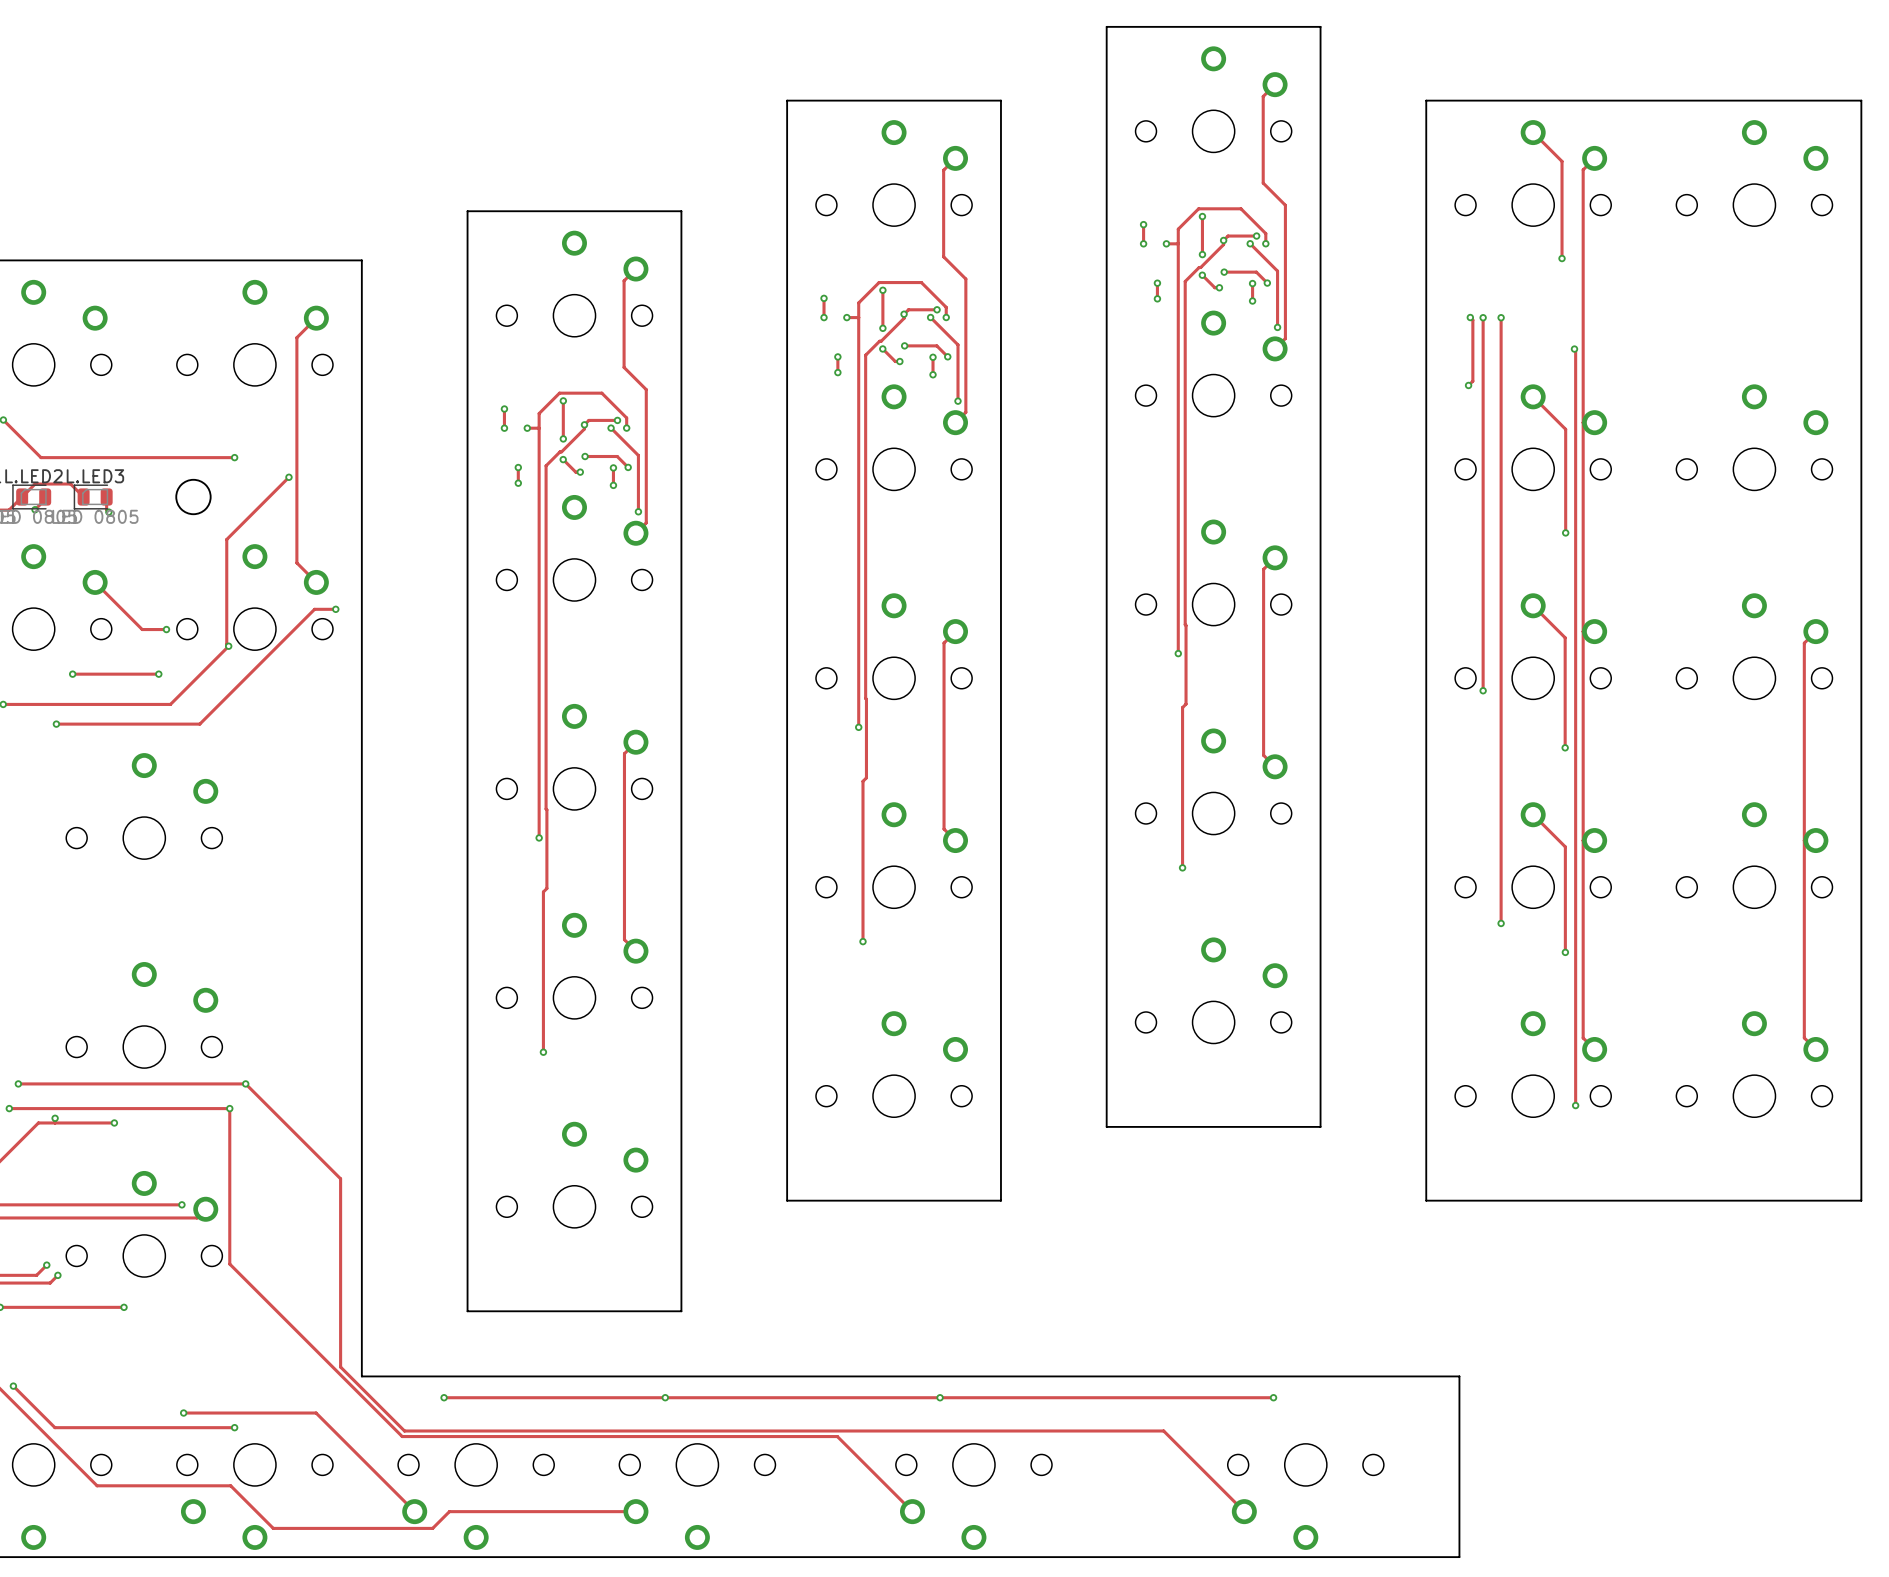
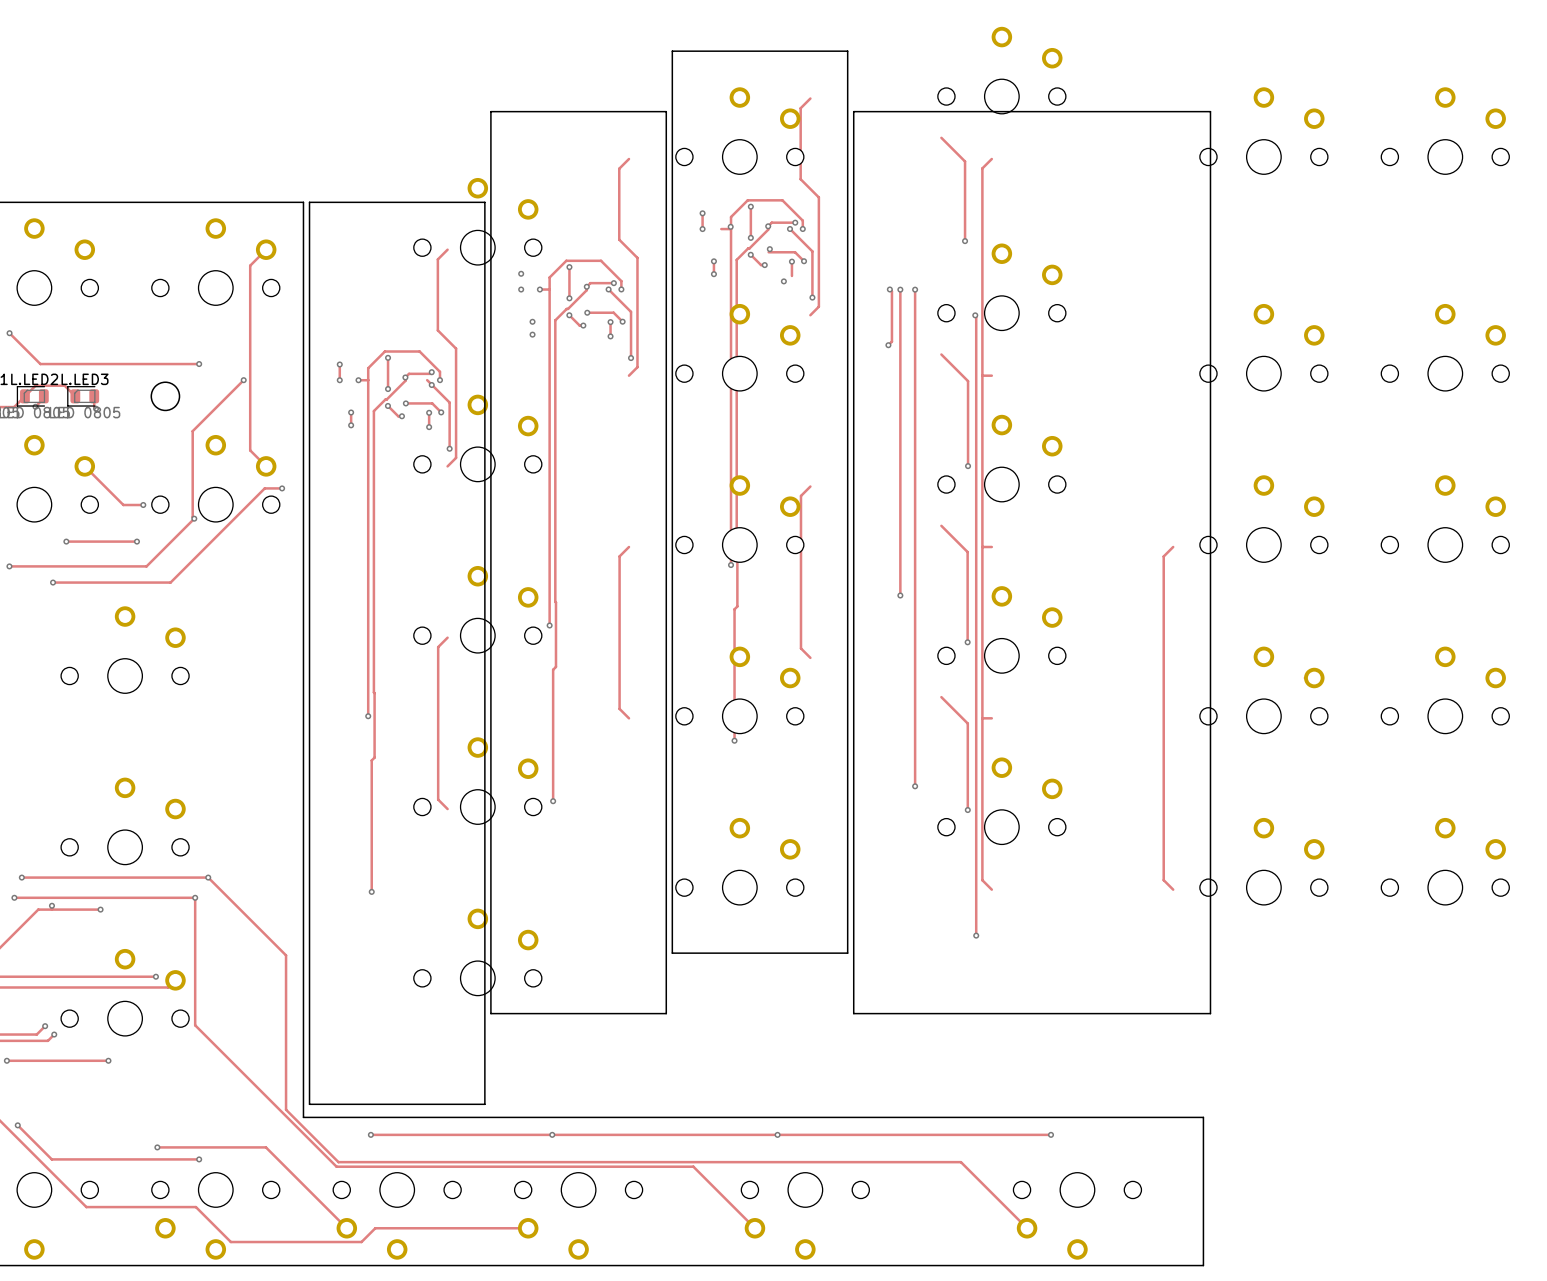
board edge: (1106, 26) (1106, 1126) (1320, 1126) (1320, 26) (1106, 26) -> none
track: (1275, 84) (1263, 96) (1263, 183) (1285, 205) (1285, 338) (1275, 348) -> none
board edge: (787, 100) (787, 1200) (1000, 1200) (1000, 100) (787, 100) -> (672, 51) (672, 953) (847, 953) (847, 51) (672, 51)
board edge: (1426, 100) (1861, 100) (1861, 1200) (1426, 1200) (1426, 100) -> none
track: (1533, 132) (1562, 161) (1562, 258) -> none
board edge: none -> (490, 111) (490, 1013) (666, 1013) (666, 111) (490, 111)
board edge: none -> (853, 111) (1210, 111) (1210, 1013) (853, 1013) (853, 111)
track: (955, 158) (943, 170) (943, 256) (965, 279) (965, 412) (955, 422) -> (810, 98) (800, 108) (800, 179) (818, 197) (818, 306) (810, 315)
track: (1594, 158) (1583, 169) (1583, 1038) (1594, 1049) -> none
track: none -> (941, 137) (965, 161) (965, 241)
track: none -> (628, 159) (619, 168) (619, 239) (637, 257) (637, 367) (628, 375)
track: none -> (991, 159) (982, 168) (982, 880) (991, 889)
board edge: (467, 211) (467, 1311) (681, 1311) (681, 211) (467, 211) -> (309, 202) (309, 1104) (484, 1104) (484, 202) (309, 202)
track: (1202, 216) (1202, 254) -> none
via: (1202, 216) -> none
track: (1143, 224) (1143, 243) -> none
via: (1143, 224) -> none
track: (1256, 236) (1228, 236) (1223, 240) (1223, 244) (1185, 281) (1186, 704) (1182, 707) (1182, 867) -> none
via: (1256, 236) -> none
via: (1223, 240) -> none
via: (1143, 243) -> none
track: (1166, 243) (1178, 243) -> none
via: (1166, 243) -> none
track: (1250, 243) (1277, 271) (1277, 327) -> none
via: (1250, 243) -> none
track: (1265, 243) (1265, 233) (1241, 208) (1198, 208) (1178, 229) (1178, 653) -> none
via: (1265, 243) -> none
via: (1202, 254) -> none
via: (1562, 258) -> none
via: none -> (750, 206)
track: (635, 269) (624, 280) (624, 367) (646, 389) (646, 522) (635, 533) -> (447, 249) (437, 259) (437, 330) (456, 348) (456, 457) (447, 466)
track: (1224, 272) (1256, 272) (1267, 283) -> none
via: (1224, 272) -> none
via: none -> (702, 213)
track: (1202, 275) (1214, 287) (1219, 287) -> none
via: (1202, 275) -> none
track: (1157, 283) (1157, 298) -> none
via: (1157, 283) -> none
track: (1252, 283) (1252, 301) -> none
via: (1252, 283) -> none
via: (1267, 283) -> none
via: none -> (795, 222)
via: (1219, 287) -> none
via: none -> (768, 226)
track: (882, 290) (882, 328) -> (750, 206) (750, 237)
via: none -> (790, 228)
via: none -> (802, 228)
via: none -> (702, 229)
track: (824, 298) (824, 317) -> (702, 213) (702, 229)
via: (824, 298) -> none
via: (1157, 298) -> none
via: (1252, 301) -> none
via: none -> (750, 237)
via: none -> (965, 241)
track: (937, 309) (908, 309) (904, 314) (904, 318) (865, 355) (866, 777) (862, 781) (862, 941) -> (795, 222) (771, 222) (768, 226) (768, 229) (736, 259) (737, 606) (734, 609) (734, 740)
via: (937, 309) -> none
via: (904, 314) -> none
via: (824, 317) -> none
track: (846, 317) (858, 317) -> (721, 229) (731, 229)
via: (846, 317) -> none
track: (930, 317) (957, 344) (957, 401) -> (790, 228) (812, 251) (812, 297)
track: (946, 317) (946, 307) (921, 282) (879, 282) (858, 302) (858, 727) -> (802, 228) (802, 220) (782, 200) (747, 200) (731, 217) (731, 565)
via: (946, 317) -> none
track: (1470, 317) (1472, 320) (1472, 381) (1468, 385) -> none
via: (1470, 317) -> none
track: (1483, 317) (1483, 690) -> none
via: (1483, 317) -> none
track: (1501, 317) (1501, 923) -> none
via: (1501, 317) -> none
via: none -> (750, 254)
via: (1277, 327) -> none
via: (882, 328) -> none
via: none -> (713, 261)
via: none -> (791, 261)
via: none -> (804, 261)
via: none -> (764, 265)
track: none -> (569, 267) (569, 298)
via: none -> (569, 267)
track: (904, 345) (936, 345) (947, 356) -> (768, 252) (795, 252) (804, 261)
via: (904, 345) -> none
via: none -> (521, 273)
via: none -> (713, 274)
track: (882, 348) (895, 361) (899, 361) -> (750, 254) (761, 265) (764, 265)
via: (882, 348) -> none
track: (1574, 349) (1575, 1105) -> none
via: (1574, 349) -> none
track: (837, 356) (837, 372) -> (713, 261) (713, 274)
via: (837, 356) -> none
track: (933, 357) (933, 374) -> (791, 261) (791, 275)
via: (933, 357) -> none
track: none -> (613, 283) (590, 283) (586, 286) (586, 290) (555, 320) (555, 666) (553, 669) (553, 801)
via: none -> (613, 283)
via: (899, 361) -> none
via: none -> (586, 286)
via: none -> (521, 289)
track: none -> (539, 289) (549, 289)
via: none -> (539, 289)
track: none -> (608, 289) (631, 311) (631, 358)
via: none -> (608, 289)
track: none -> (621, 289) (621, 281) (601, 260) (566, 260) (549, 277) (549, 625)
via: none -> (621, 289)
track: none -> (889, 289) (891, 291) (891, 341) (888, 345)
via: none -> (889, 289)
track: none -> (900, 289) (900, 595)
via: none -> (900, 289)
track: none -> (915, 289) (915, 786)
via: none -> (915, 289)
via: (837, 372) -> none
via: (933, 374) -> none
via: none -> (812, 297)
via: none -> (569, 298)
via: (1468, 385) -> none
track: none -> (587, 312) (613, 312) (622, 321)
via: none -> (587, 312)
track: (1533, 396) (1565, 429) (1565, 532) -> none
track: none -> (569, 315) (579, 325) (583, 325)
via: none -> (569, 315)
track: none -> (975, 315) (976, 935)
via: none -> (975, 315)
track: (563, 400) (563, 438) -> (388, 357) (388, 389)
via: (563, 400) -> none
via: (957, 401) -> none
via: none -> (622, 321)
via: none -> (532, 321)
track: none -> (610, 322) (610, 336)
via: none -> (610, 322)
track: (504, 408) (504, 428) -> (339, 364) (339, 380)
via: (504, 408) -> none
via: none -> (583, 325)
track: (617, 420) (588, 420) (584, 424) (584, 428) (546, 465) (546, 888) (543, 891) (543, 1052) -> (432, 373) (409, 373) (405, 377) (405, 380) (373, 411) (374, 757) (371, 760) (371, 891)
via: (617, 420) -> none
via: none -> (532, 334)
via: none -> (610, 336)
via: (584, 424) -> none
via: (504, 428) -> none
track: (527, 428) (539, 428) -> (358, 380) (368, 380)
via: (527, 428) -> none
track: (611, 428) (638, 455) (638, 511) -> (427, 380) (449, 402) (449, 448)
via: (611, 428) -> none
track: (626, 428) (626, 417) (601, 393) (559, 393) (539, 413) (539, 837) -> (439, 380) (439, 371) (419, 351) (384, 351) (368, 368) (368, 716)
via: (626, 428) -> none
via: none -> (888, 345)
via: (563, 438) -> none
track: none -> (941, 354) (968, 381) (968, 466)
via: none -> (388, 357)
via: none -> (631, 358)
track: (585, 456) (617, 456) (628, 467) -> (405, 403) (432, 403) (441, 412)
via: (585, 456) -> none
via: none -> (339, 364)
track: (563, 459) (575, 472) (580, 472) -> (387, 405) (398, 416) (401, 416)
via: (563, 459) -> none
track: (518, 467) (518, 483) -> (351, 412) (351, 425)
track: (613, 467) (613, 485) -> (429, 412) (429, 427)
via: (613, 467) -> none
via: (628, 467) -> none
track: none -> (982, 375) (991, 375)
via: (580, 472) -> none
via: none -> (405, 377)
via: none -> (339, 380)
via: none -> (358, 380)
via: none -> (439, 380)
via: (613, 485) -> none
via: none -> (388, 389)
via: none -> (405, 403)
via: none -> (387, 405)
via: (638, 511) -> none
via: none -> (351, 412)
via: none -> (441, 412)
via: none -> (429, 412)
via: none -> (401, 416)
via: none -> (351, 425)
via: (1565, 532) -> none
via: none -> (429, 427)
track: (1275, 557) (1263, 569) (1263, 755) (1275, 766) -> none
via: none -> (449, 448)
via: none -> (968, 466)
track: (1533, 605) (1565, 637) (1565, 747) -> none
track: (955, 631) (944, 643) (944, 829) (955, 840) -> (810, 486) (800, 495) (800, 648) (810, 657)
track: (1815, 631) (1804, 643) (1804, 1037) (1815, 1049) -> none
via: (1178, 653) -> none
track: none -> (941, 525) (967, 552) (967, 642)
track: none -> (628, 547) (619, 556) (619, 708) (628, 718)
track: none -> (982, 547) (991, 547)
track: none -> (1173, 547) (1163, 556) (1163, 880) (1173, 889)
via: (1483, 690) -> none
via position: (858, 727) -> (731, 565)
via: none -> (900, 595)
track: (635, 742) (624, 753) (624, 939) (635, 951) -> (447, 637) (438, 647) (438, 799) (447, 809)
via: (1565, 747) -> none
via: none -> (549, 625)
via: none -> (967, 642)
track: (1533, 814) (1565, 846) (1565, 952) -> none
via: (539, 837) -> none
track: none -> (941, 697) (967, 723) (967, 810)
via: (1182, 867) -> none
via: none -> (368, 716)
track: none -> (982, 718) (991, 718)
via: (1501, 923) -> none
via position: (862, 941) -> (734, 740)
via: (1565, 952) -> none
via: none -> (915, 786)
via: none -> (553, 801)
via: none -> (967, 810)
via: (543, 1052) -> none
via: none -> (371, 891)
via: (1575, 1105) -> none
via: none -> (976, 935)

